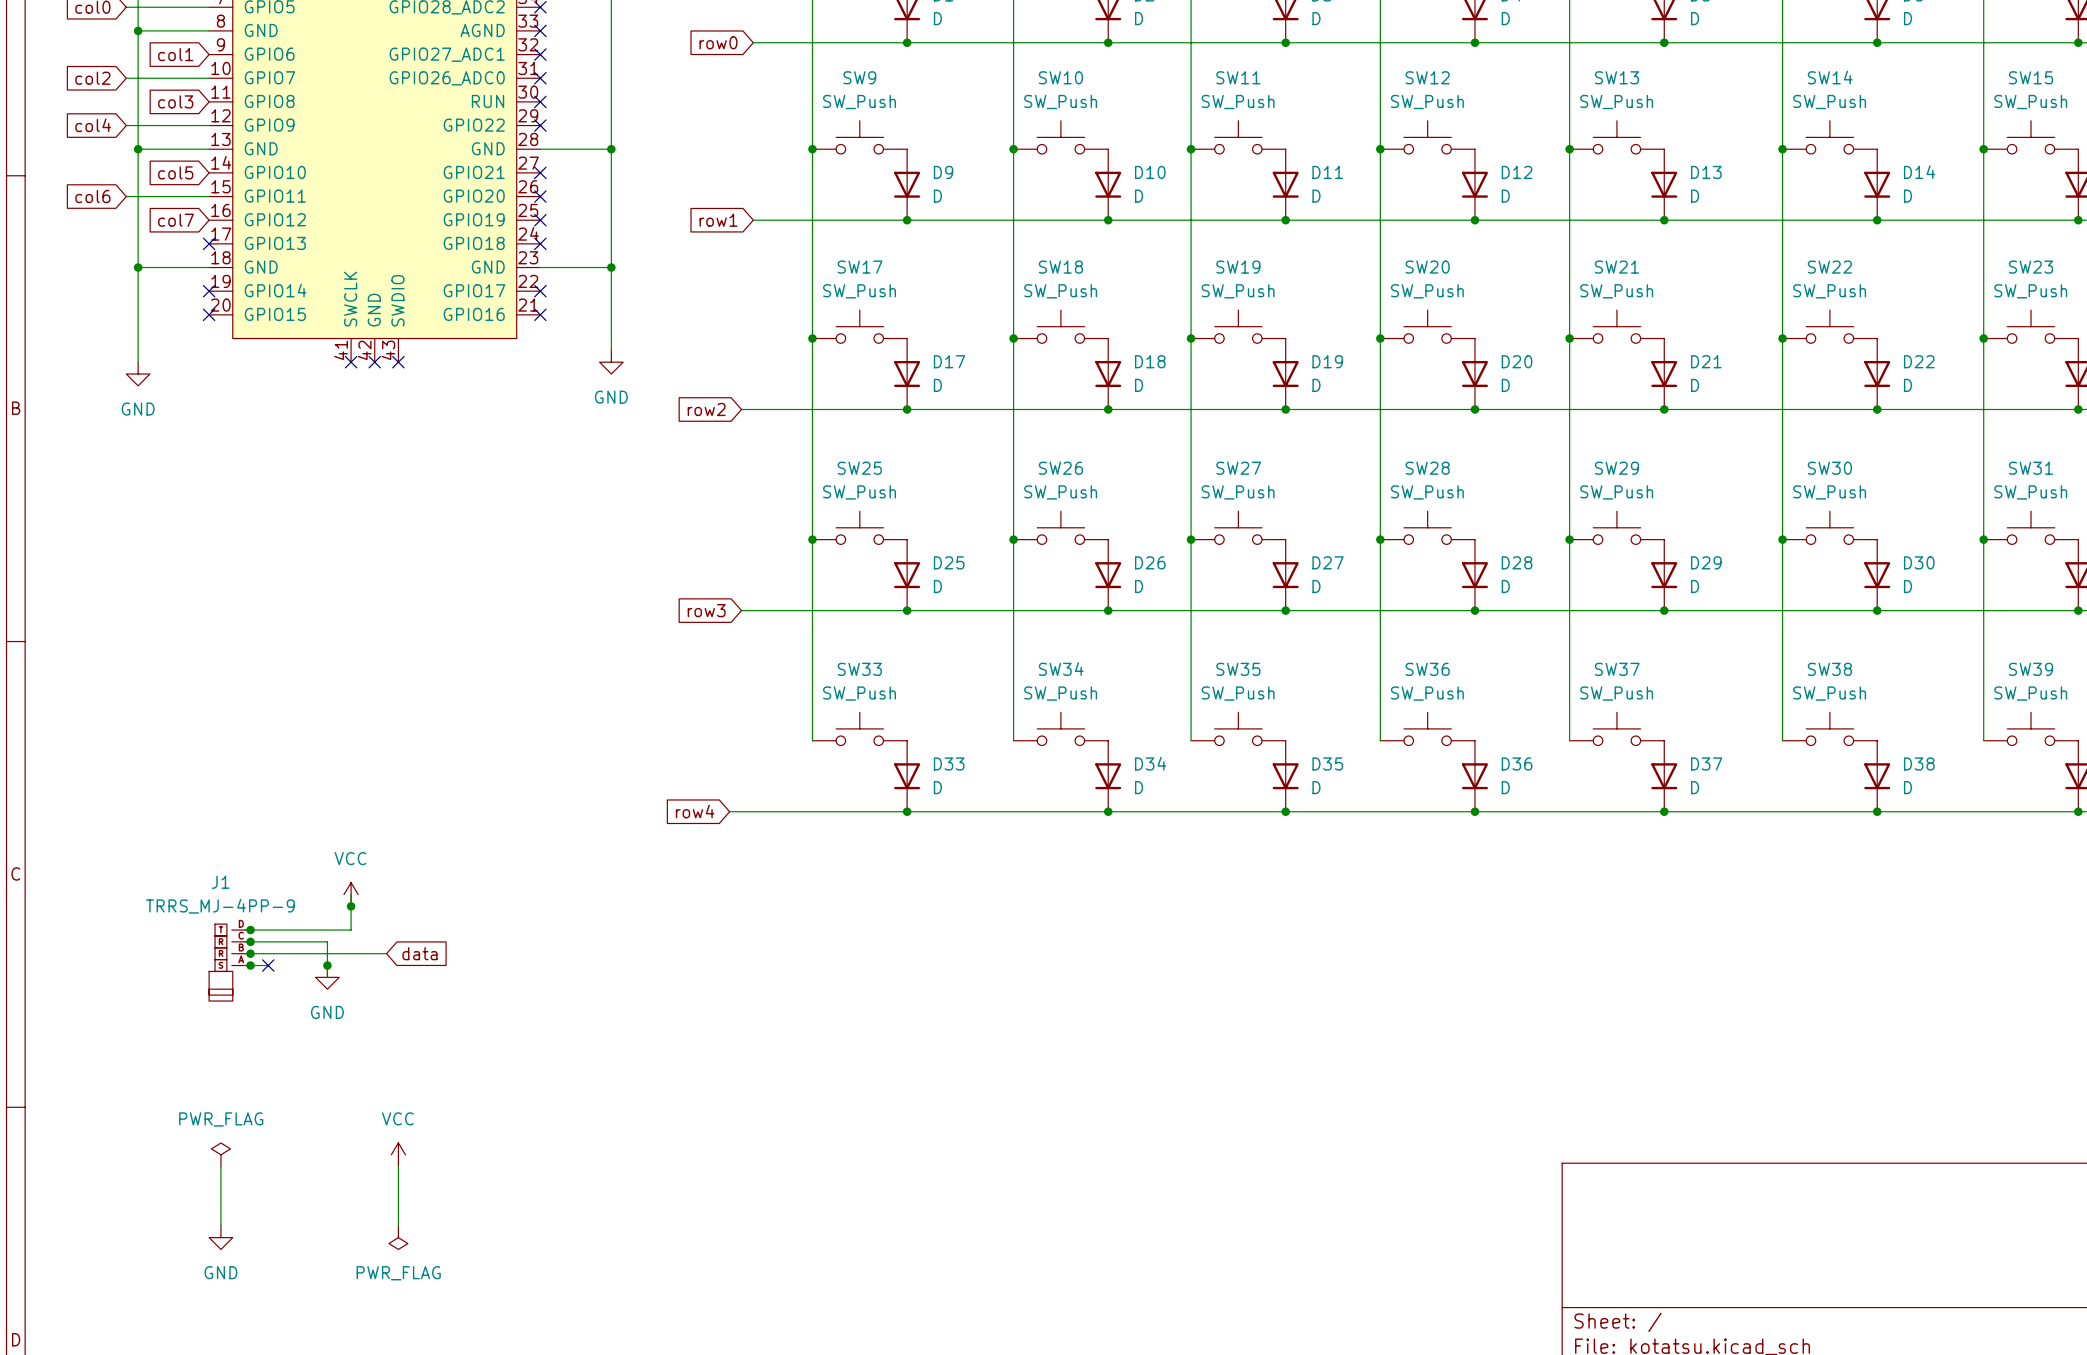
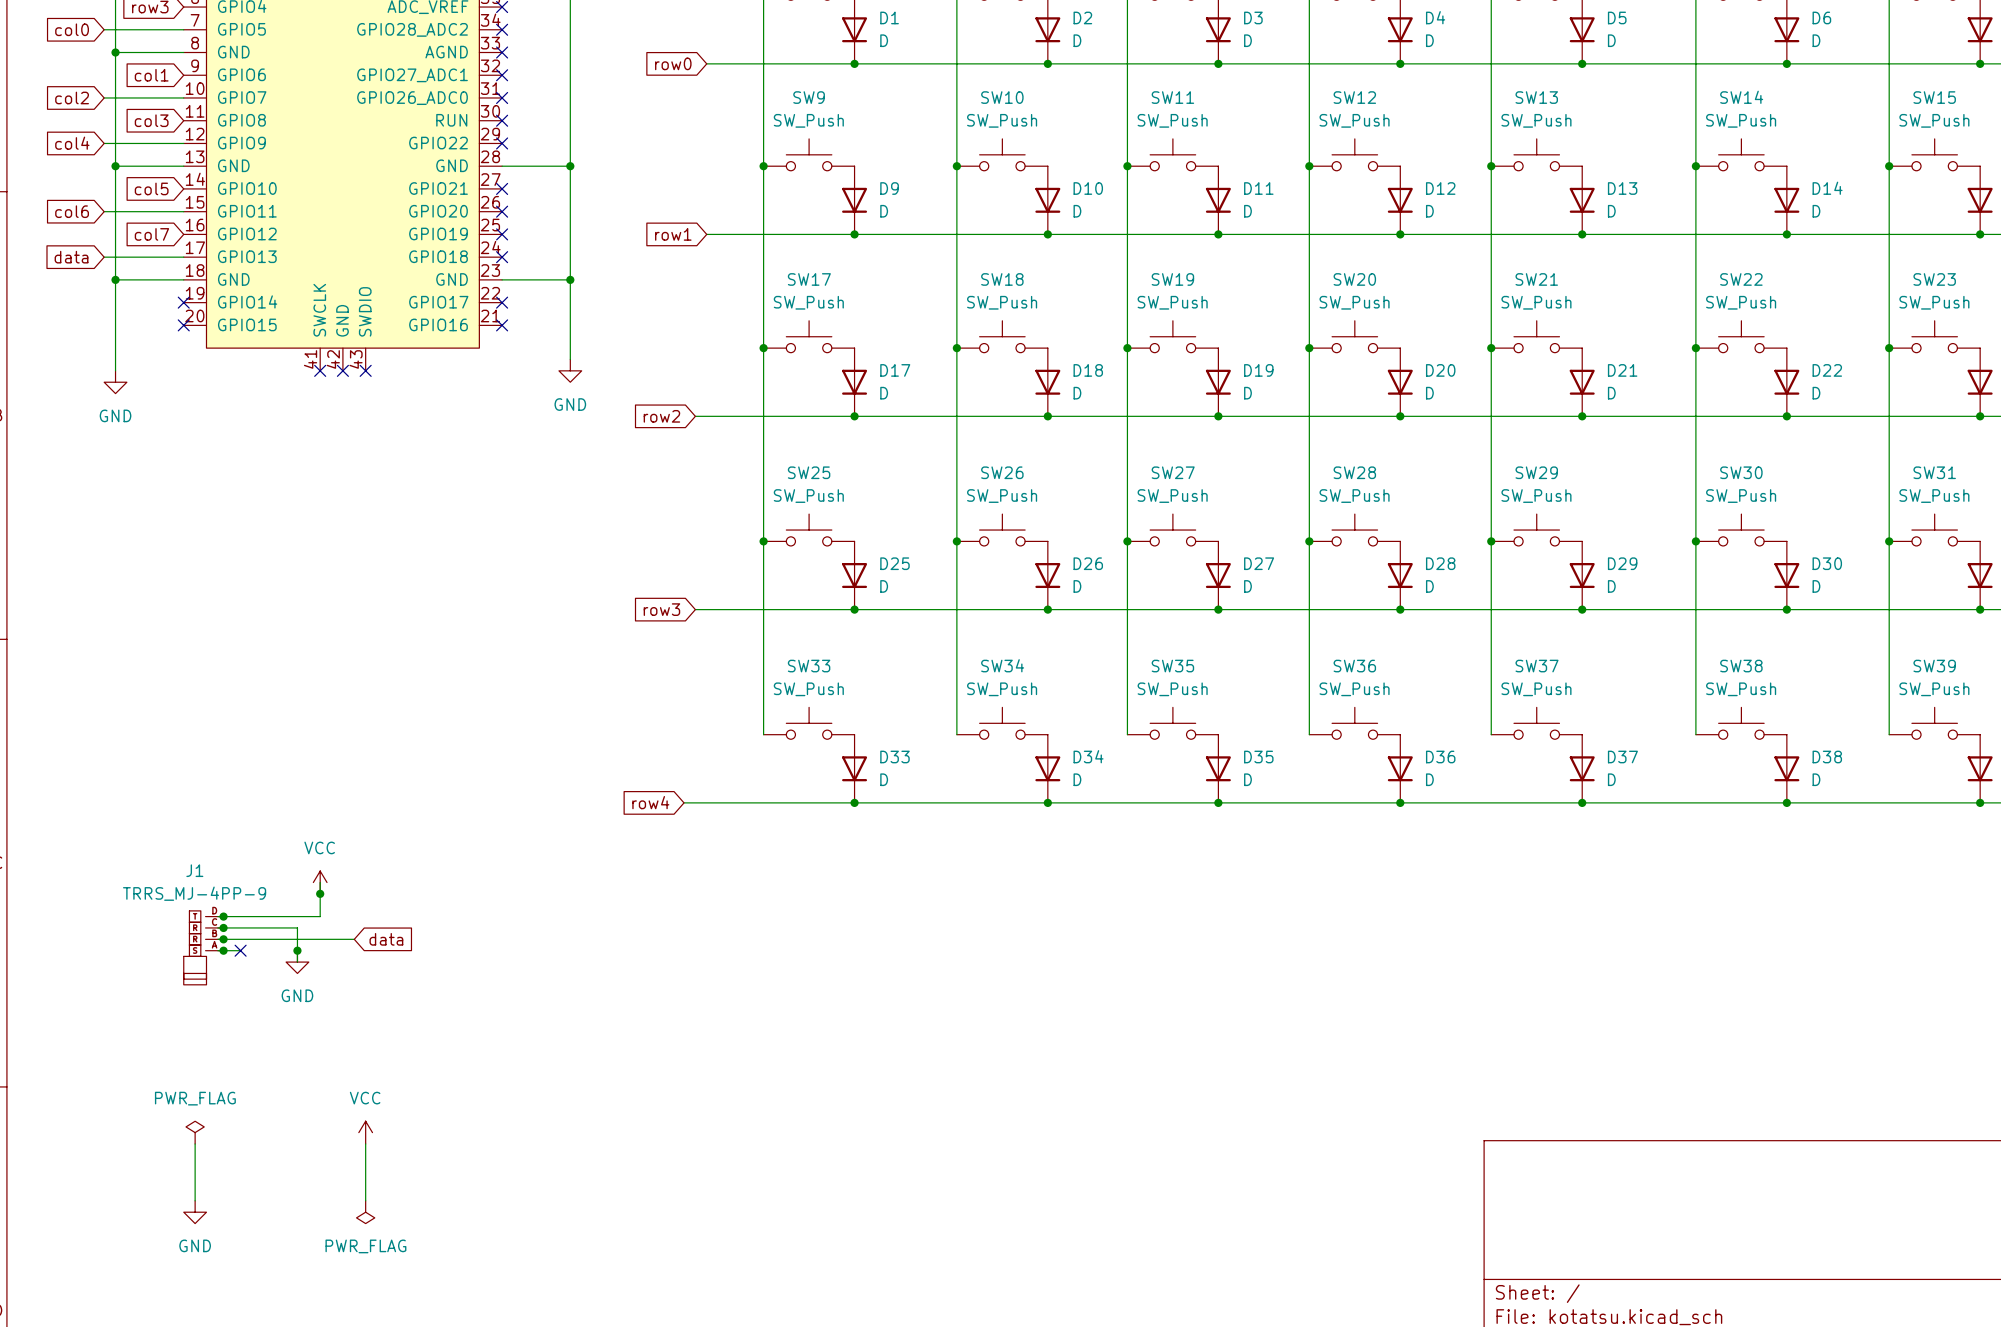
global label: none -> data (71, 257)
wire: none -> (104, 257) (183, 257)
no-connect mark: (209, 243) -> none

